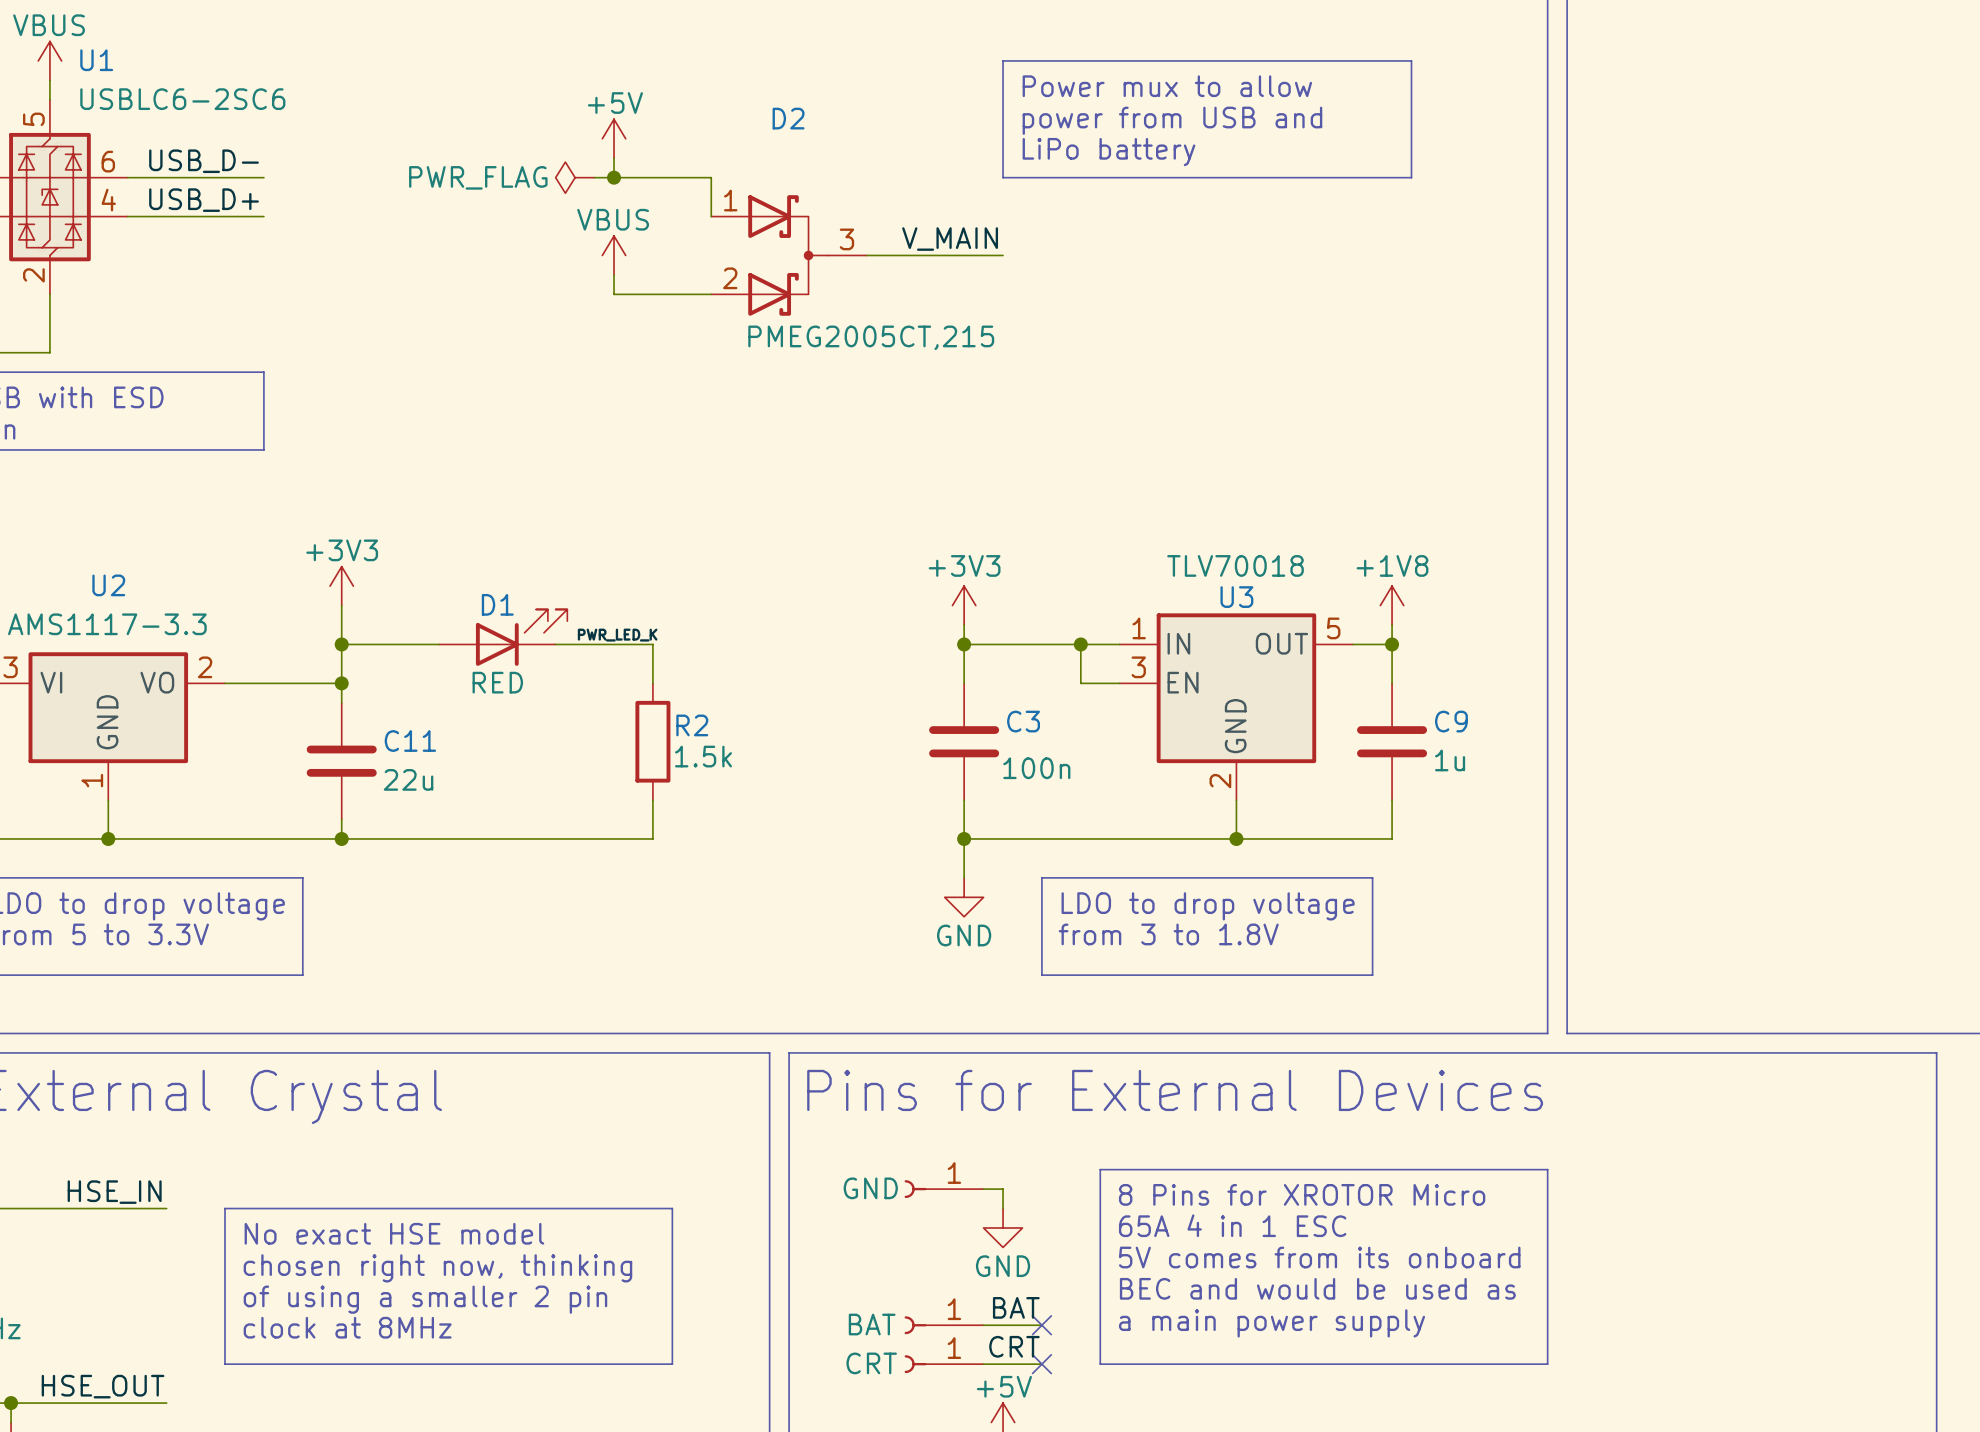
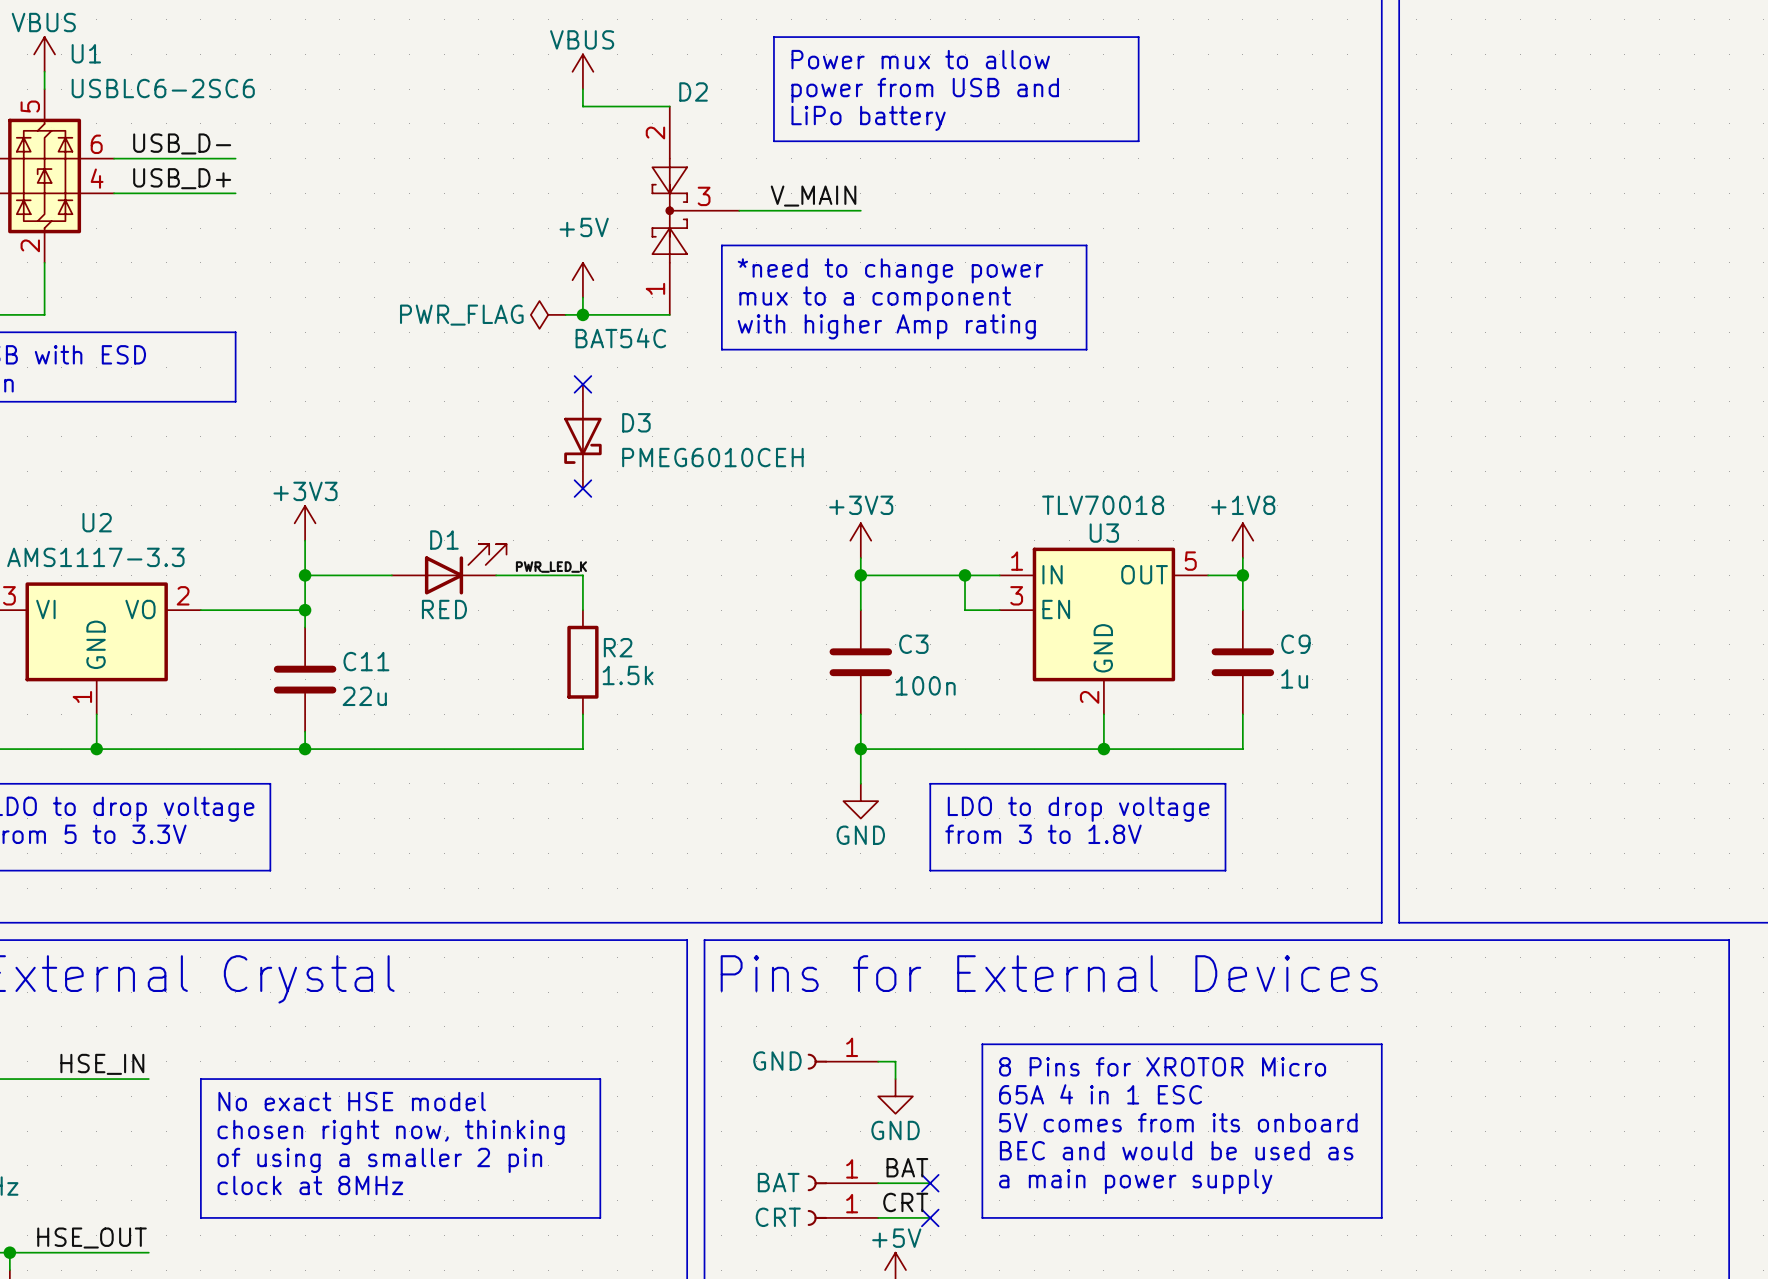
line: (1003, 60) (1411, 60) (1411, 177) (1003, 177) (1003, 60) -> (773, 37) (1138, 37) (1138, 141) (773, 141) (773, 37)
text position: Power mux to allow (1167, 86) -> Power mux to allow (920, 59)
power symbol text position: +5V (615, 103) -> +5V (584, 227)
text position: power from USB and (1172, 120) -> power from USB and (925, 90)
power symbol position: +5V (614, 138) -> +5V (582, 280)
text position: LiPo battery (1108, 152) -> LiPo battery (868, 118)
wire: (614, 158) (614, 177) -> (582, 297) (582, 314)
power symbol position: PWR_FLAG (575, 177) -> PWR_FLAG (548, 314)
wire: (594, 177) (711, 177) (711, 216) -> none
junction: (614, 177) -> none
D2 symbol: [711, 195, 867, 316] -> [652, 106, 740, 315]
label position: V_MAIN (950, 239) -> V_MAIN (813, 196)
power symbol position: VBUS (614, 255) -> VBUS (582, 71)
wire: (866, 255) (1003, 255) -> (739, 210) (860, 210)
wire: (614, 274) (614, 294) (711, 294) -> (582, 89) (582, 106) (669, 106)
line: none -> (721, 245) (1086, 245) (1086, 349) (721, 349) (721, 245)
text: none -> *need to change power (890, 270)
text: none -> mux to a component (875, 298)
D2 value: PMEG2005CT,215 (871, 337) -> BAT54C (620, 338)
wire: none -> (565, 314) (669, 314)
junction: none -> (582, 314)
text: none -> with higher Amp rating (886, 326)
no-connect mark: none -> (582, 384)
D3: none -> PMEG6010CEH (582, 436)
no-connect mark: none -> (582, 488)

